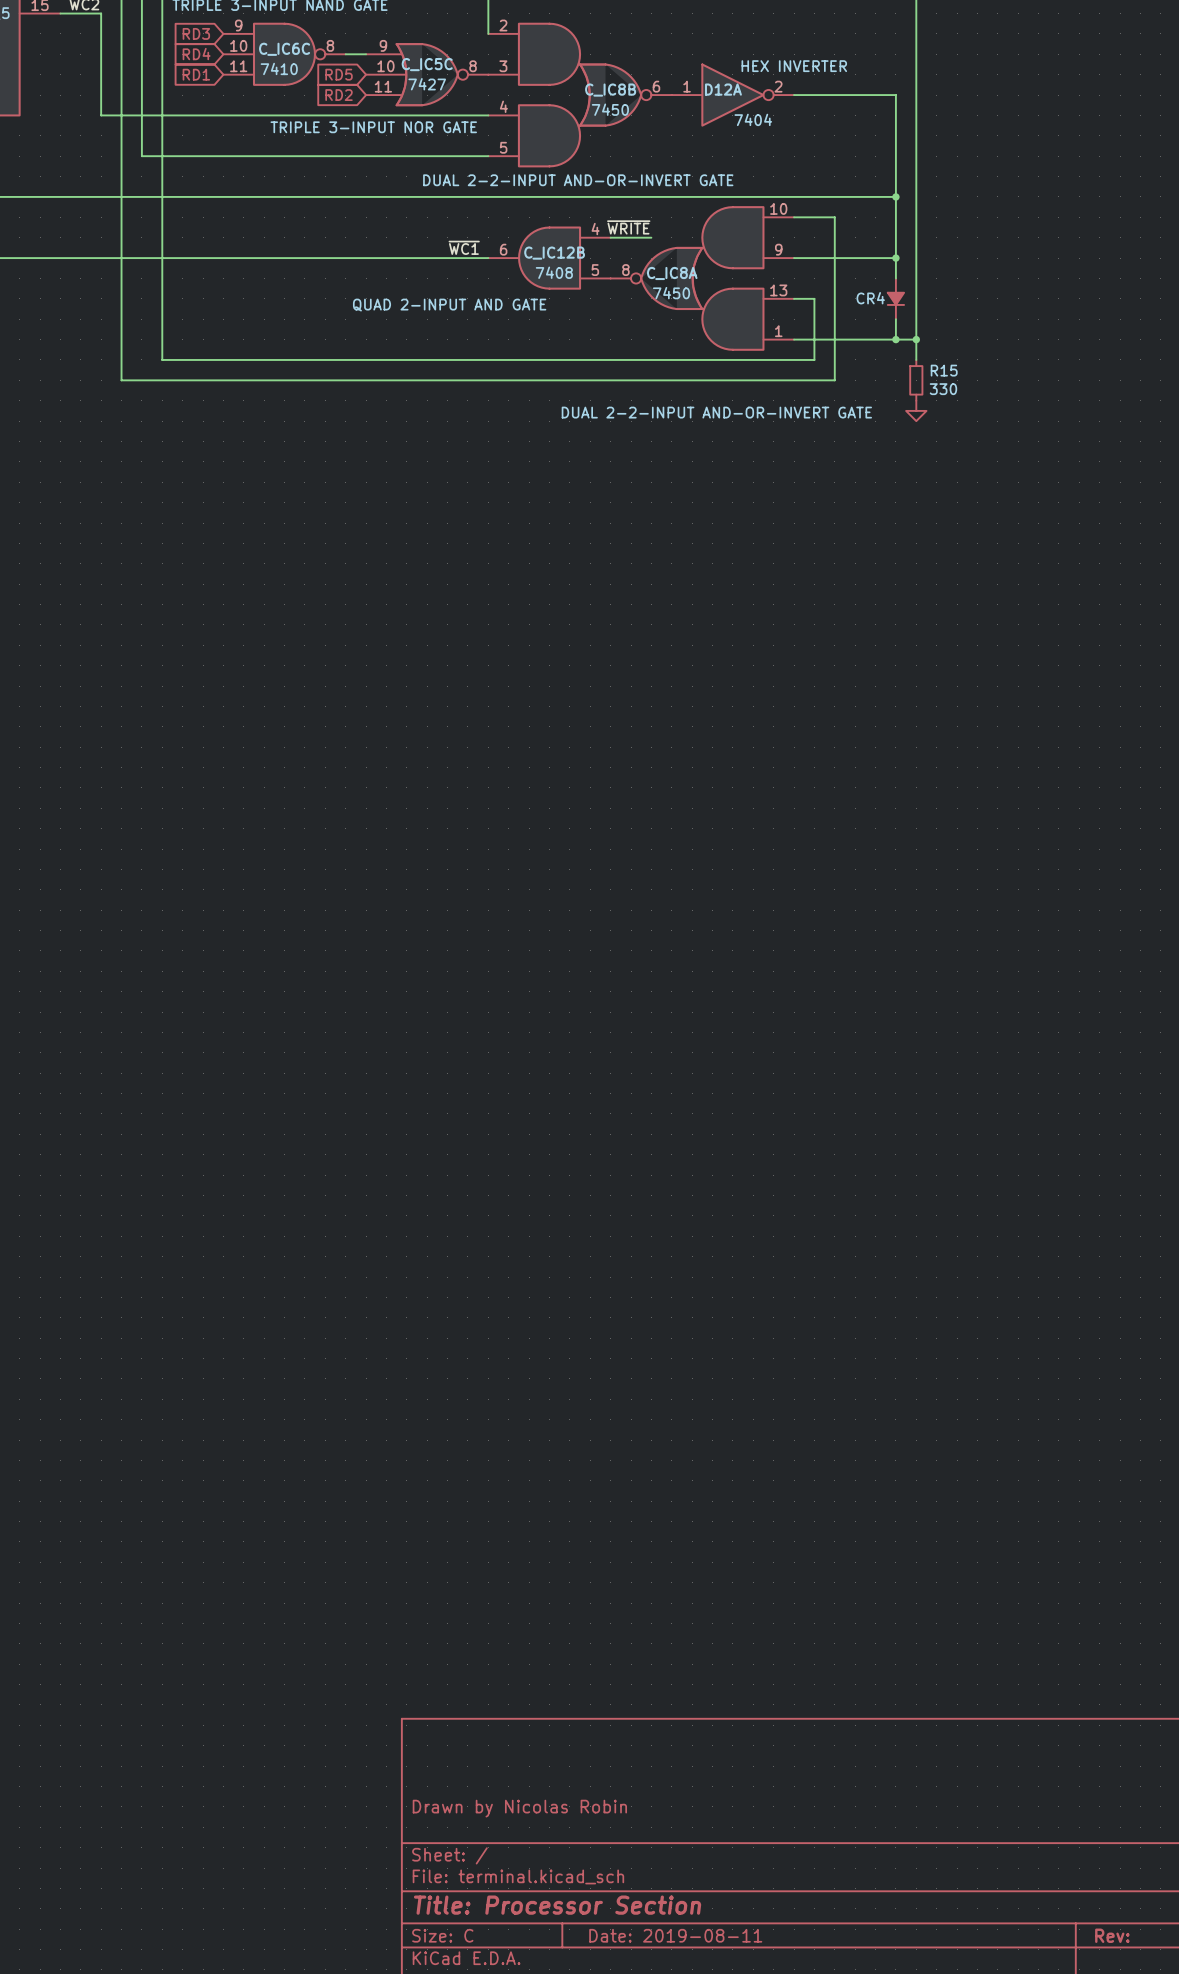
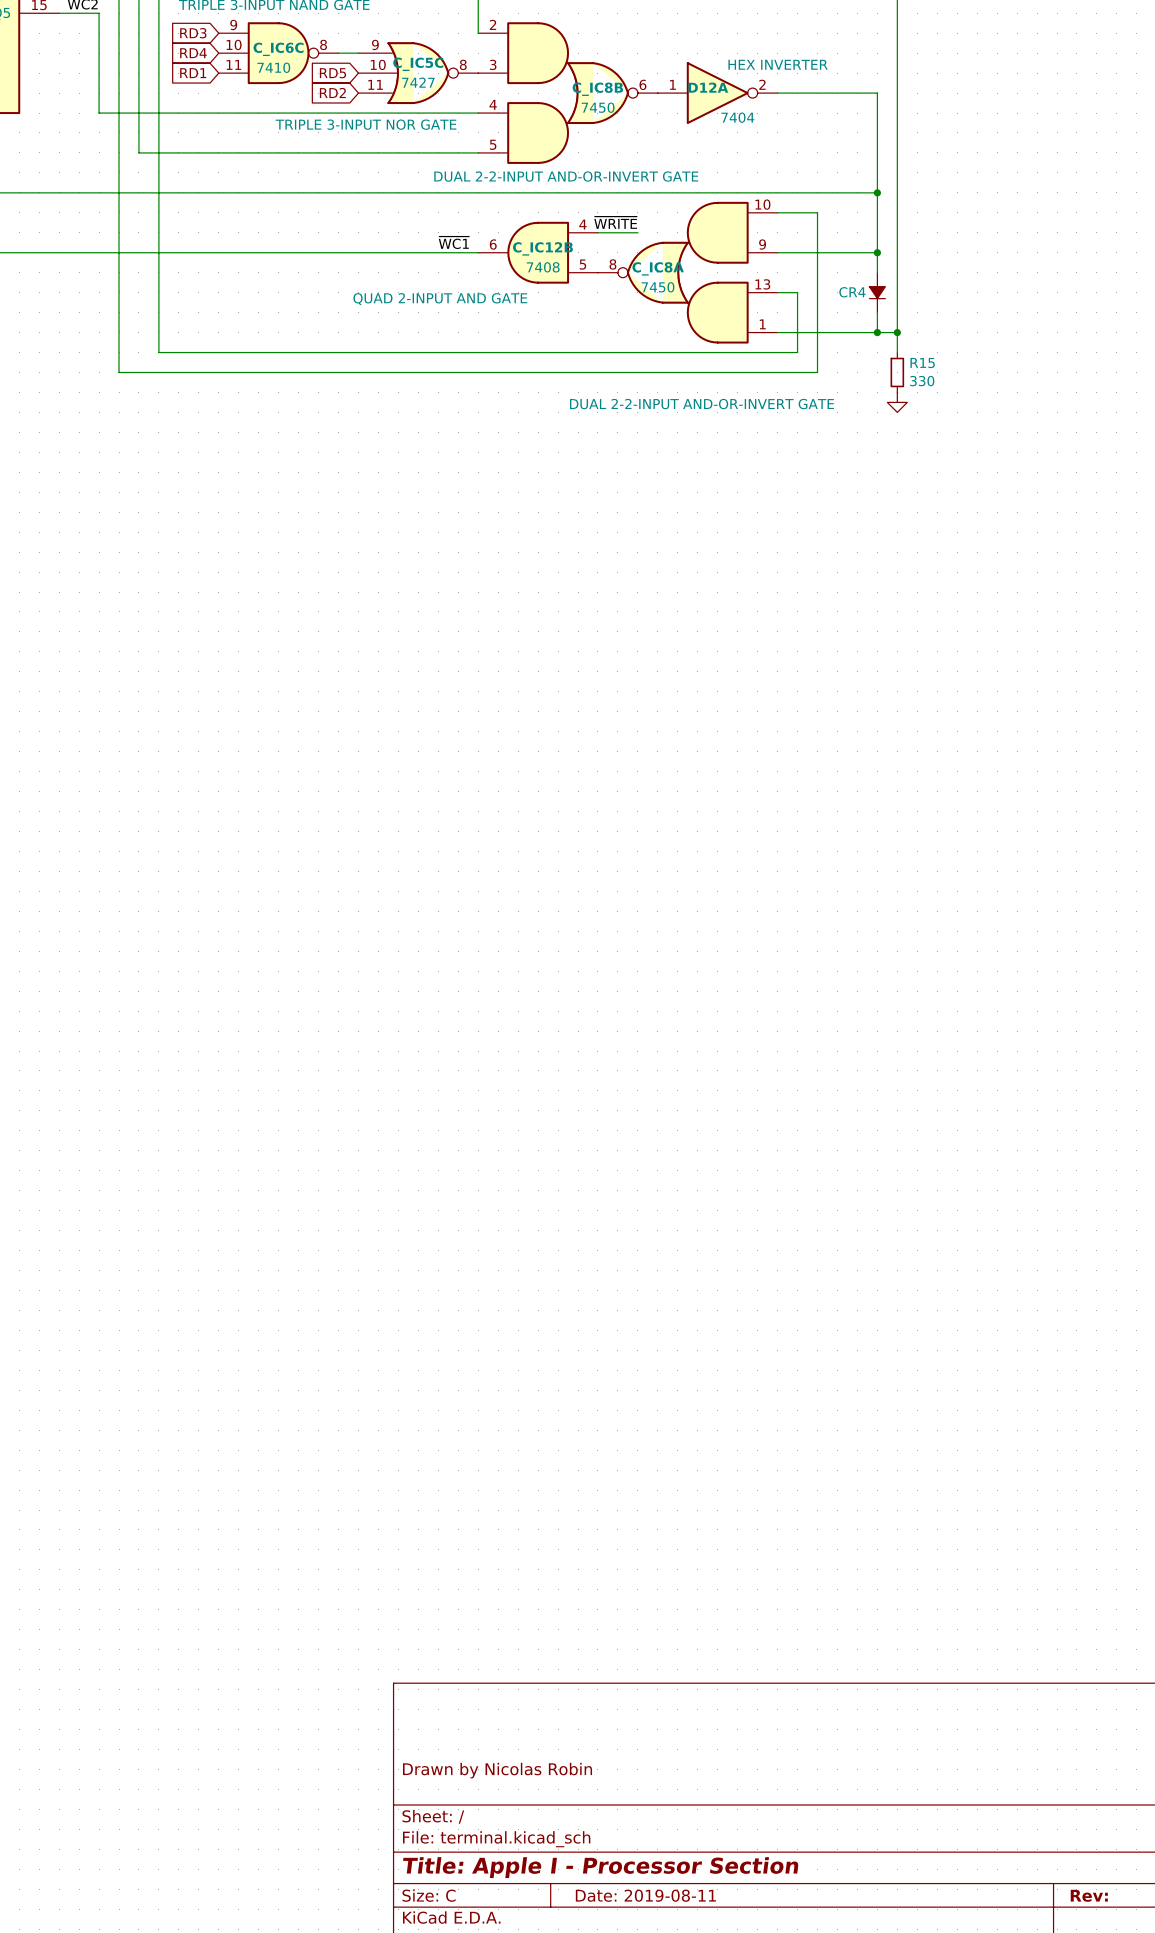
title block: Title: Processor Section (557, 1905) -> Title: Apple I - Processor Section (600, 1867)

